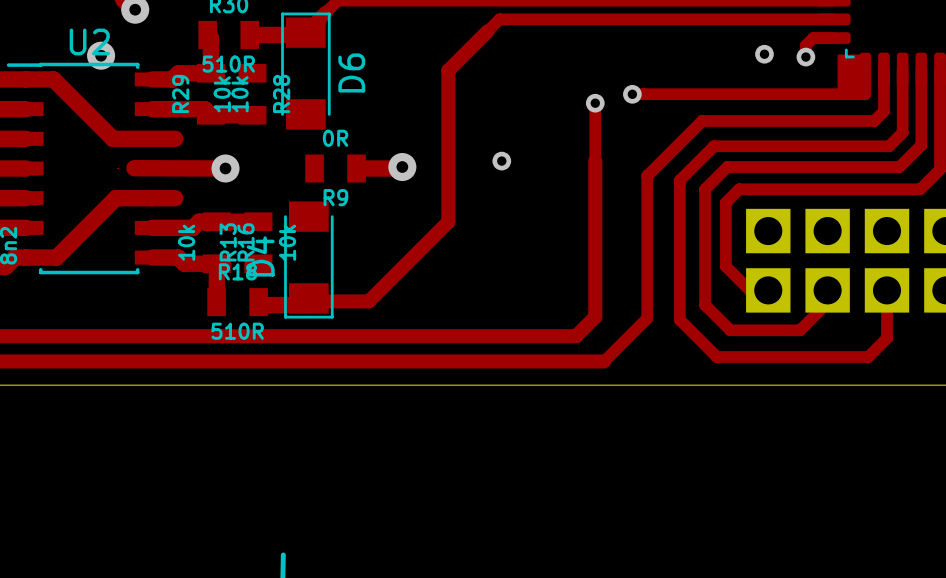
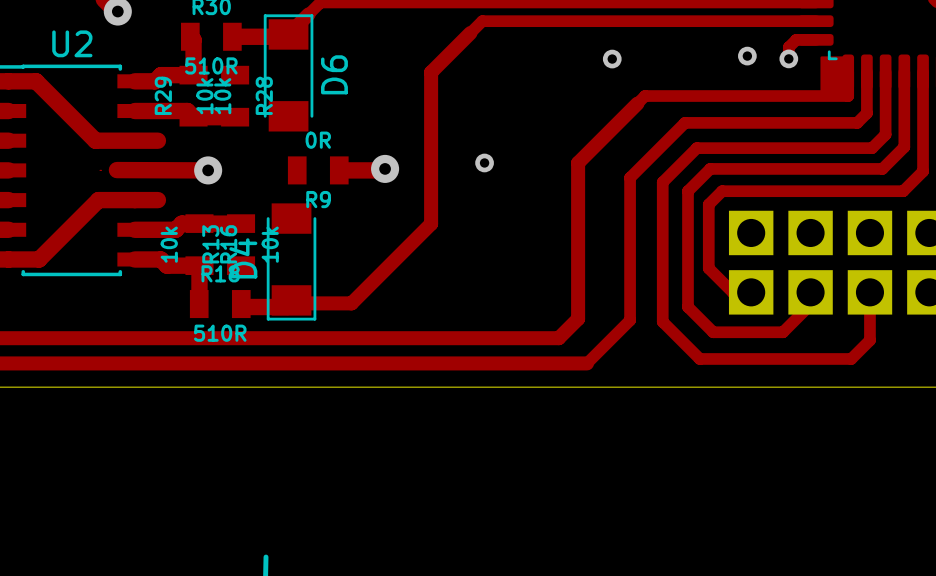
via: (101, 55) -> none
via: none -> (612, 59)
track: (632, 94) (662, 94) -> none
via: (632, 94) -> none
track: (595, 103) (595, 161) -> (645, 96) (578, 162)
via: (595, 103) -> none

